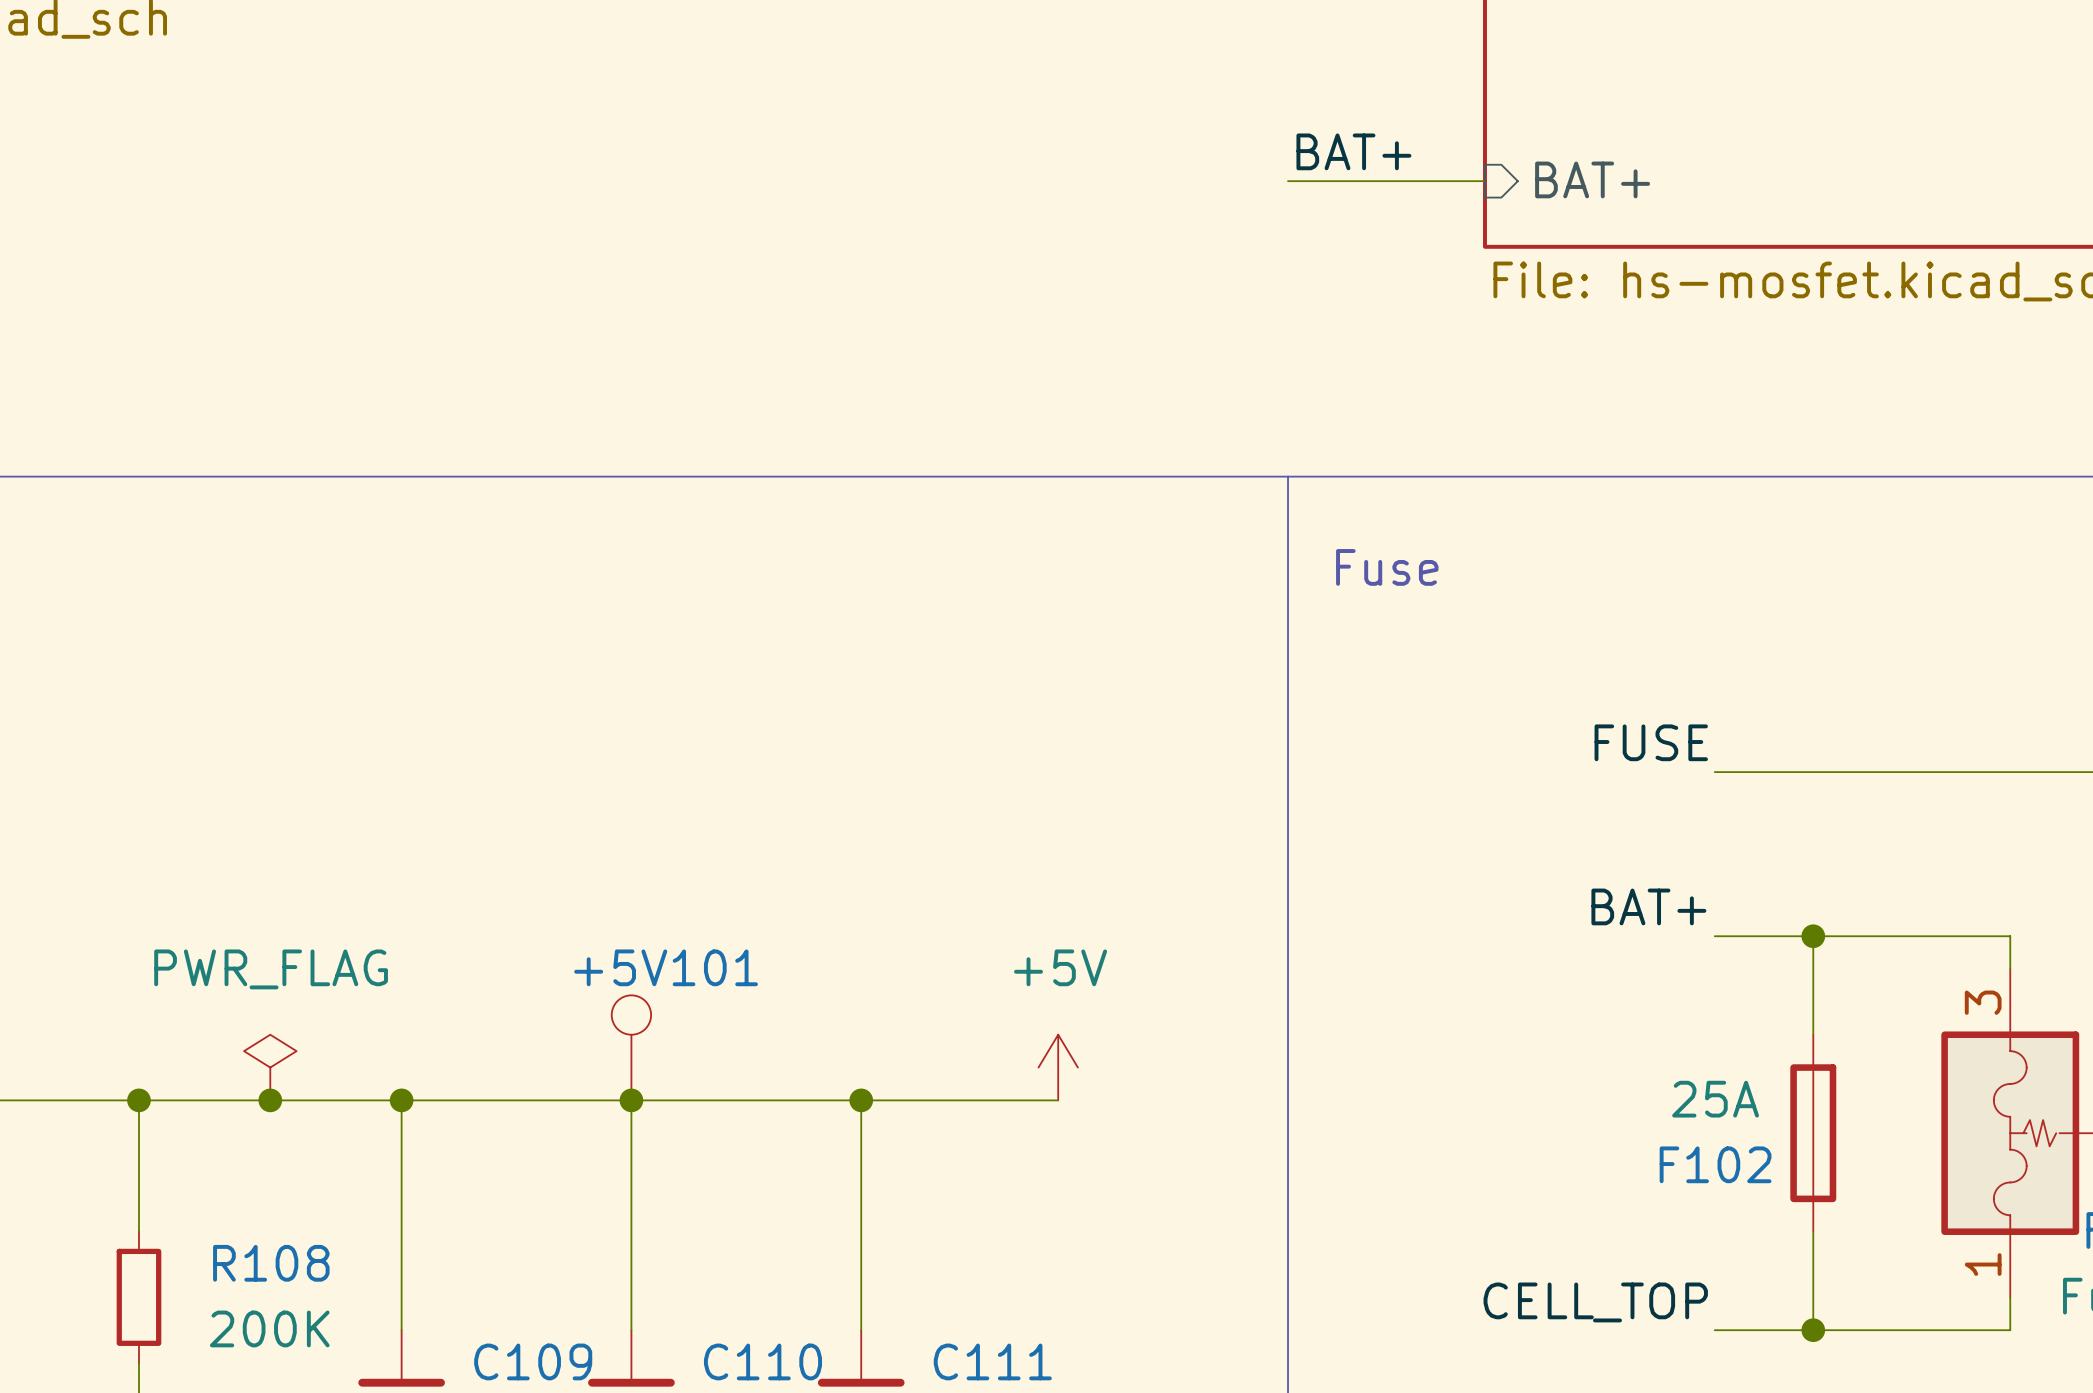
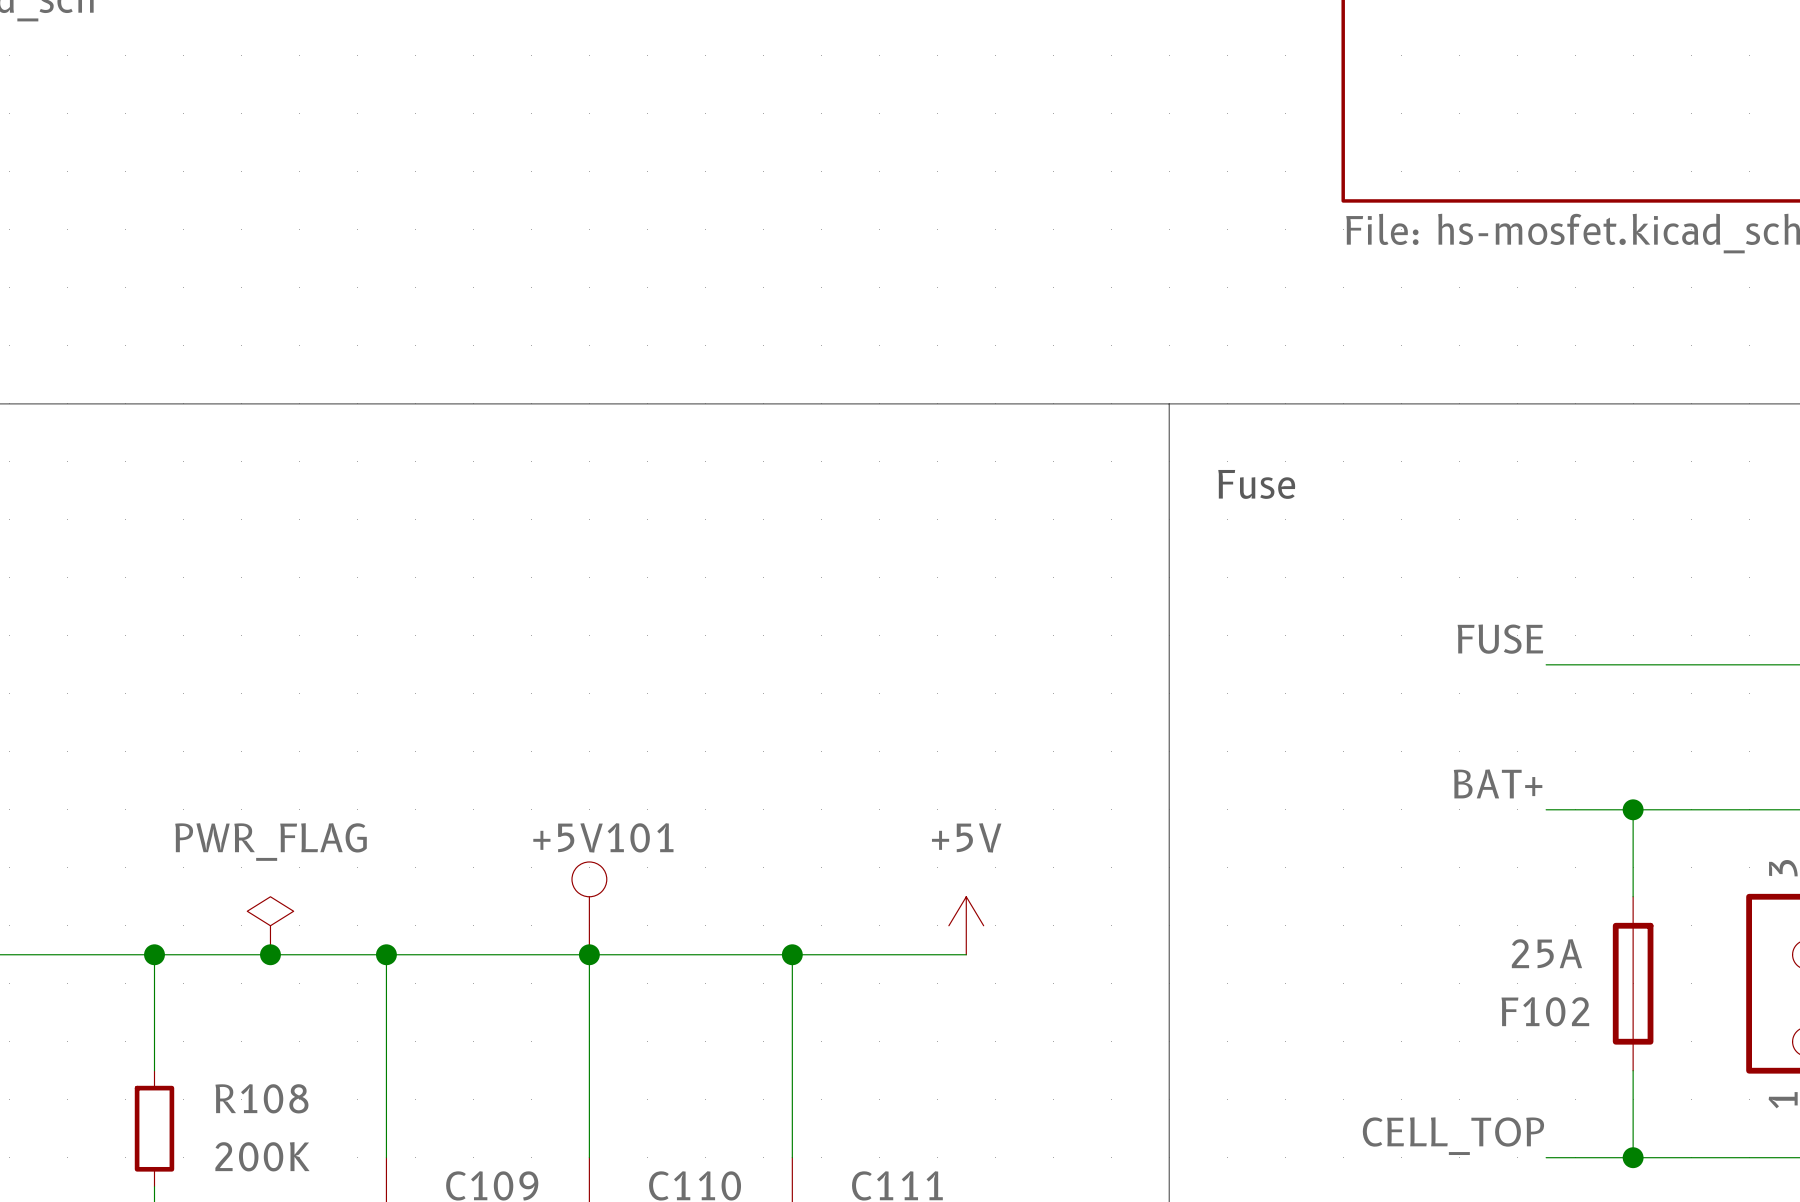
label: BAT+ (1353, 151) -> none
sheet pin: BAT+ (1592, 179) -> none
wire: (1288, 181) (1484, 181) -> none

